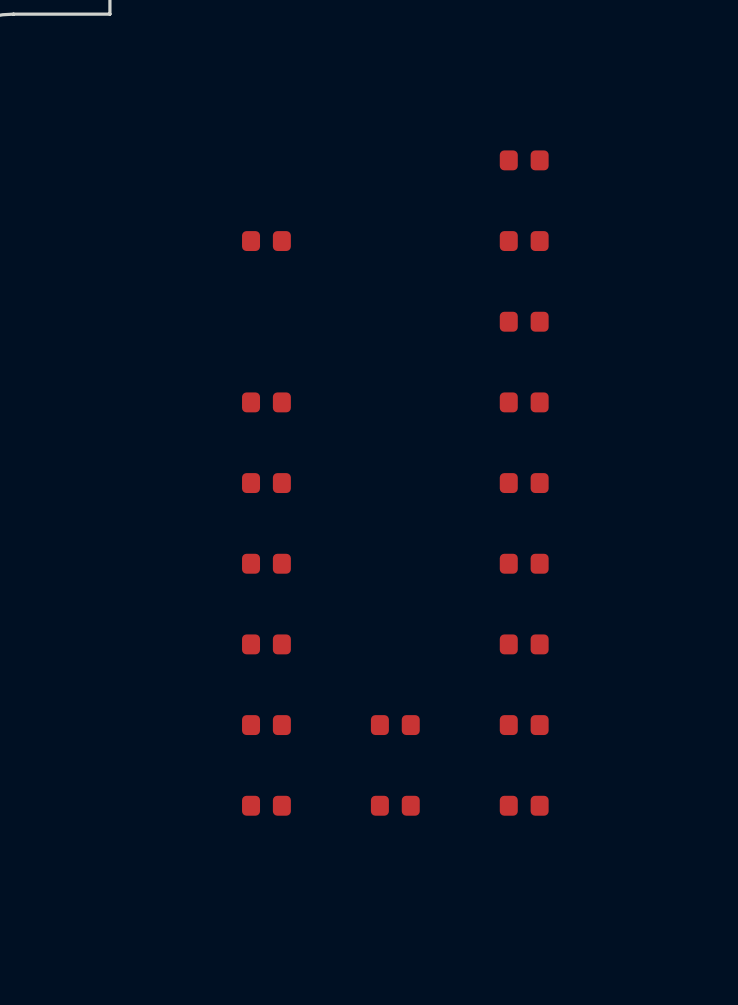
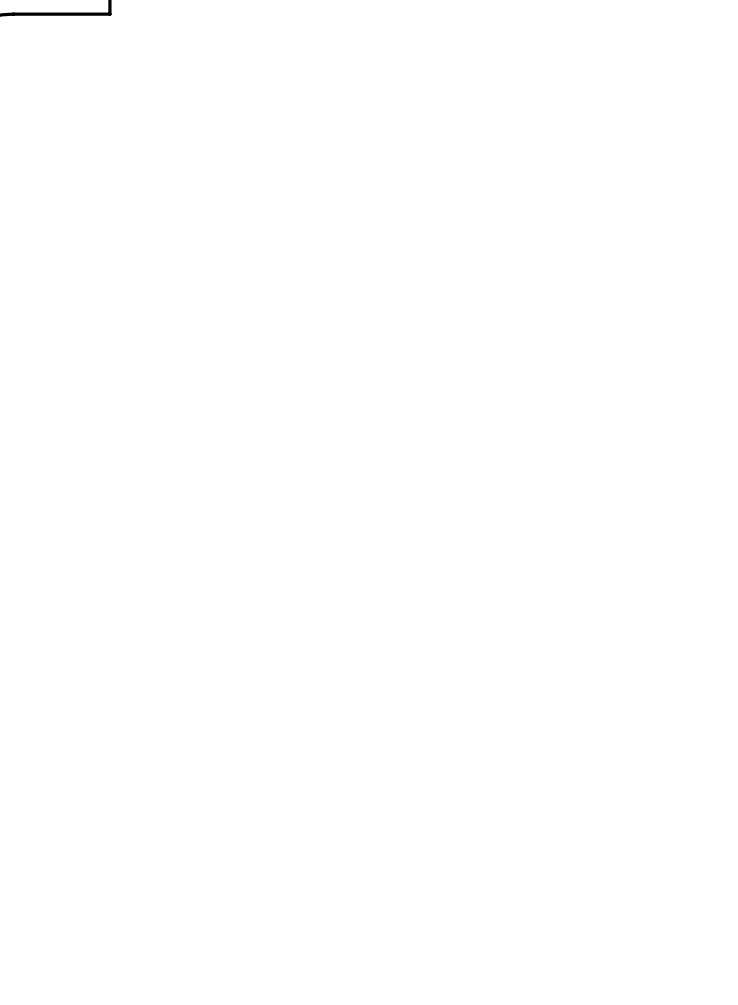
part: (524, 160) -> none
part: (266, 241) -> none
part: (524, 241) -> none
part: (524, 321) -> none
part: (266, 402) -> none
part: (524, 402) -> none
part: (266, 483) -> none
part: (524, 483) -> none
part: (266, 563) -> none
part: (524, 563) -> none
part: (266, 644) -> none
part: (524, 644) -> none
part: (266, 725) -> none
part: (395, 725) -> none
part: (524, 725) -> none
part: (266, 805) -> none
part: (395, 805) -> none
part: (524, 805) -> none

